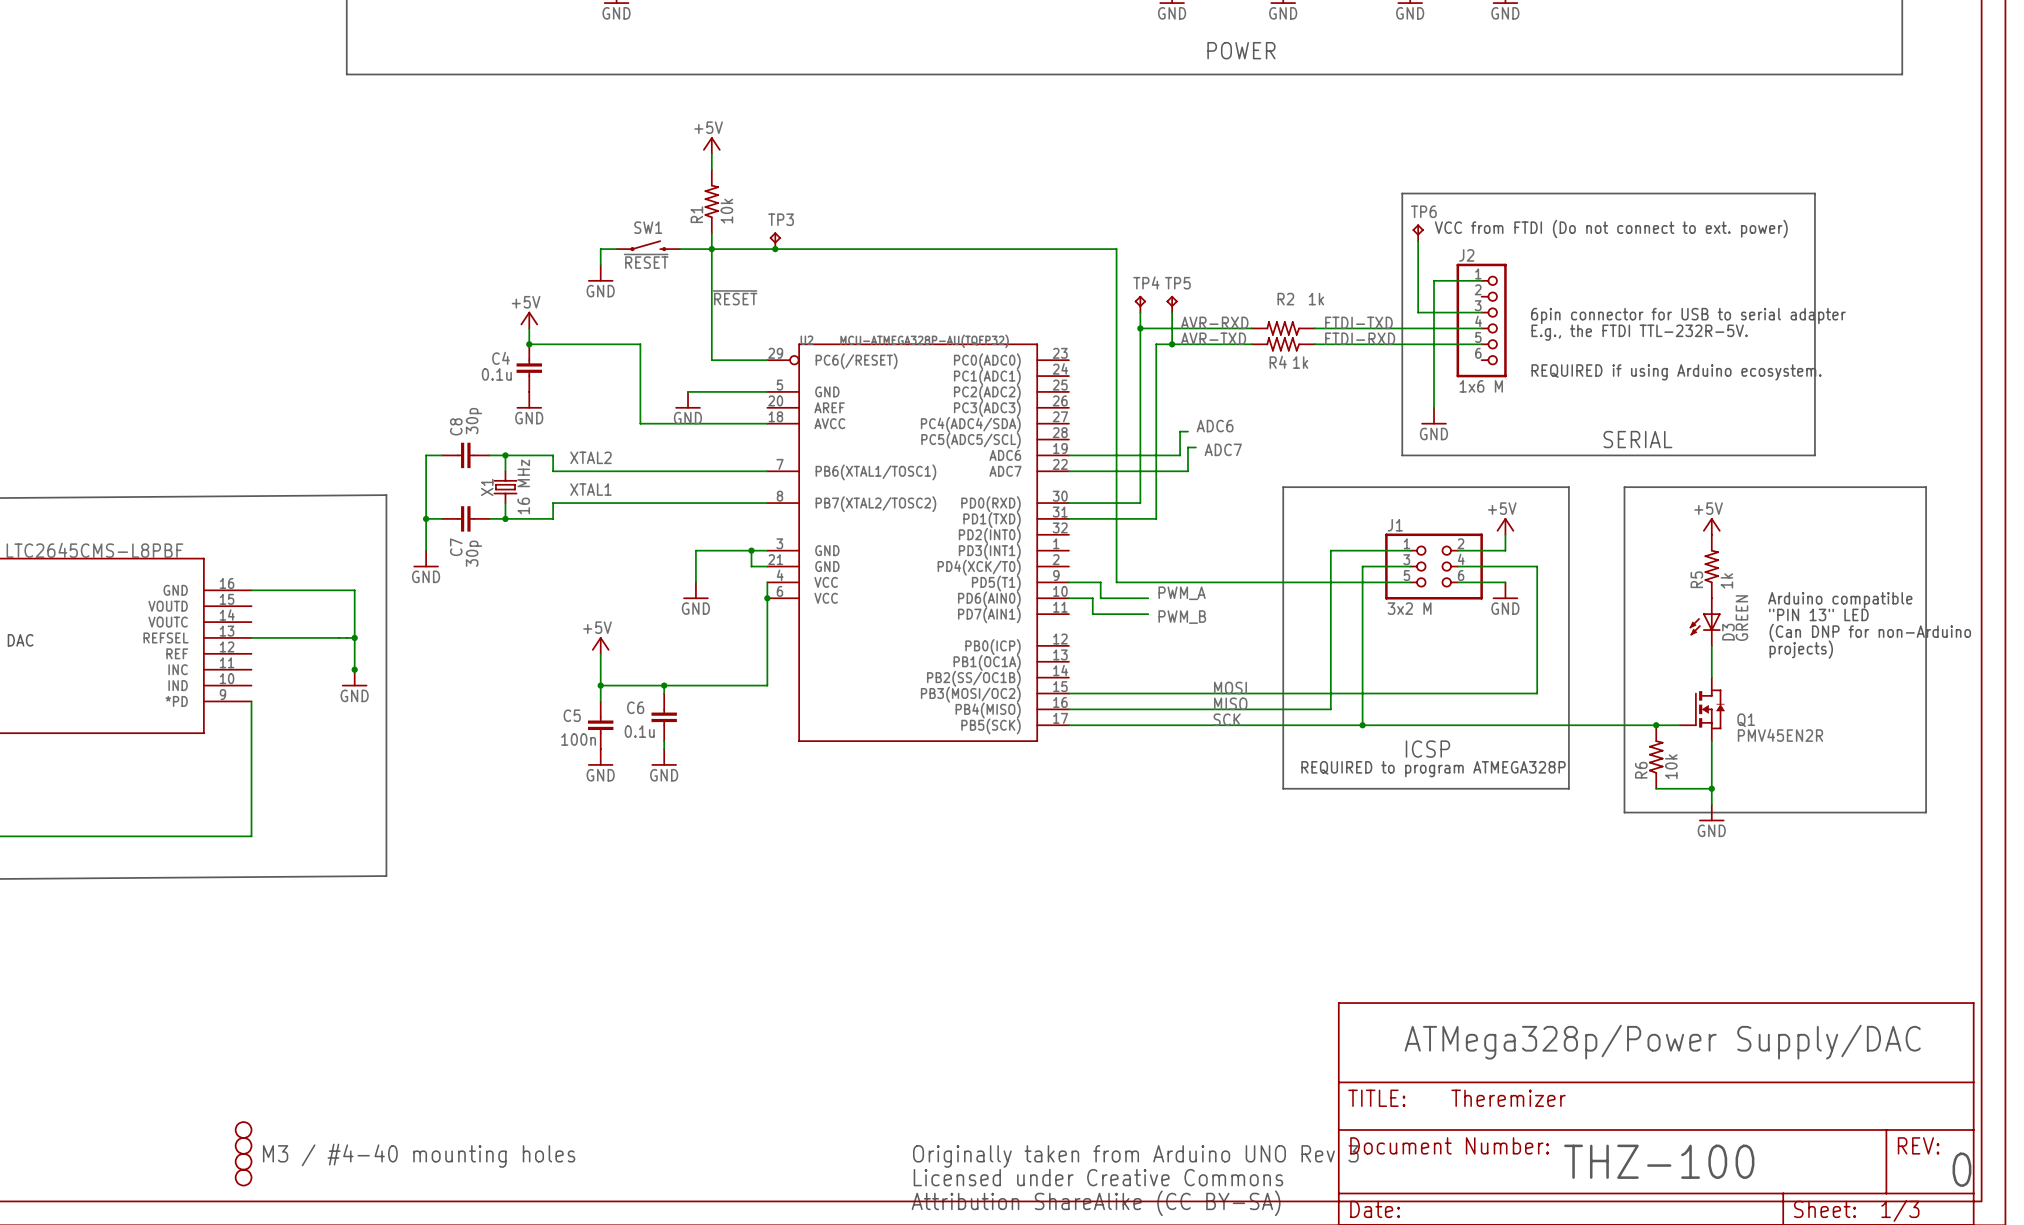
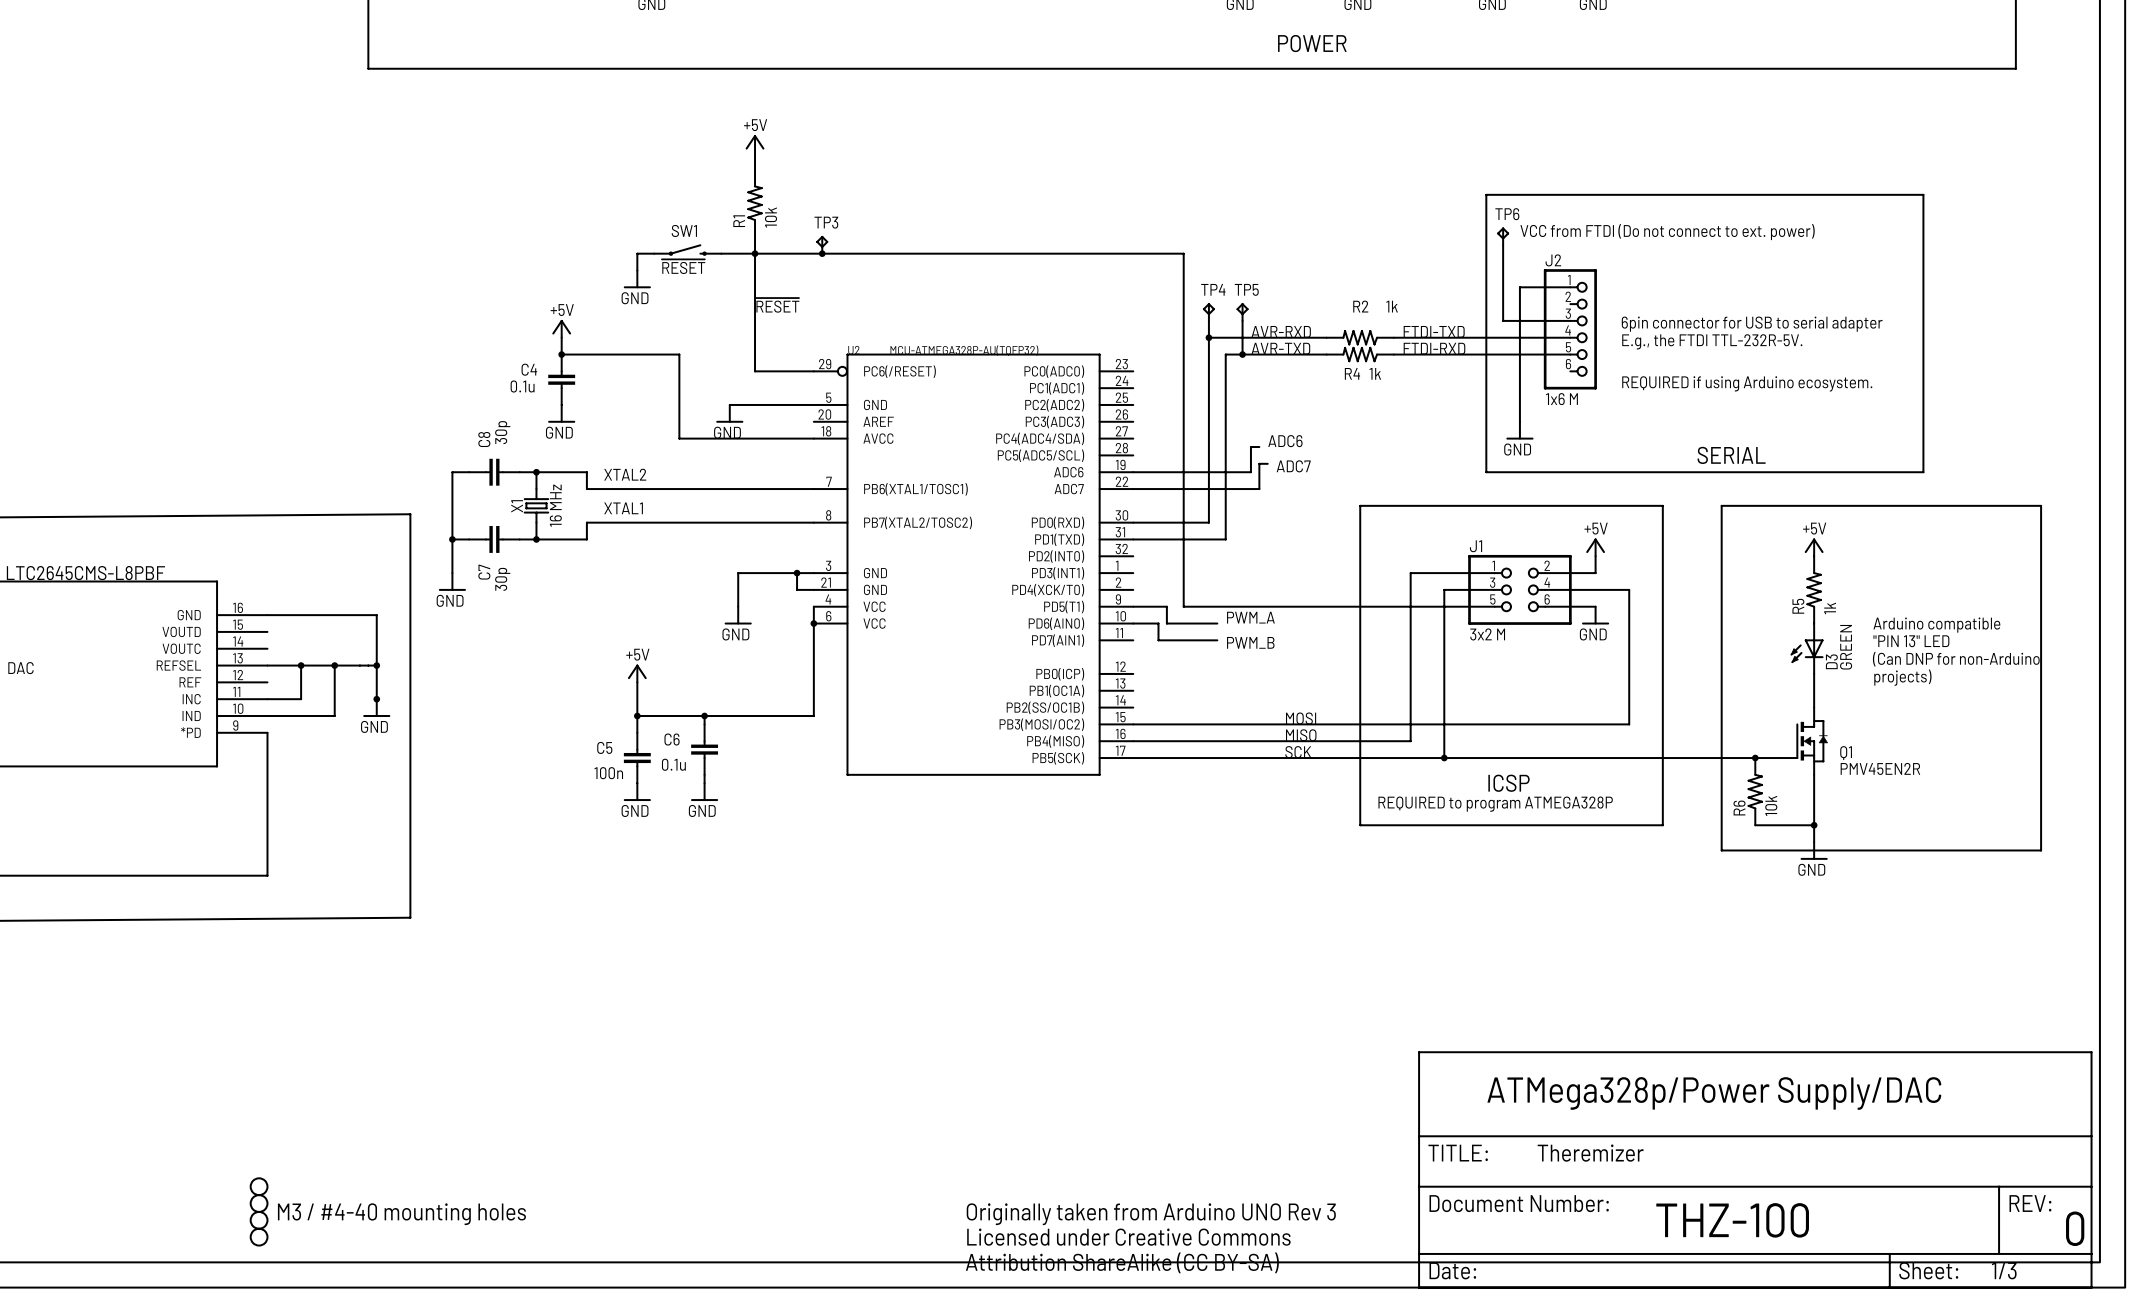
wire: none -> (301, 665) (301, 699) (267, 699)
junction: none -> (301, 665)
wire: none -> (334, 665) (334, 715) (267, 715)
junction: none -> (334, 665)

